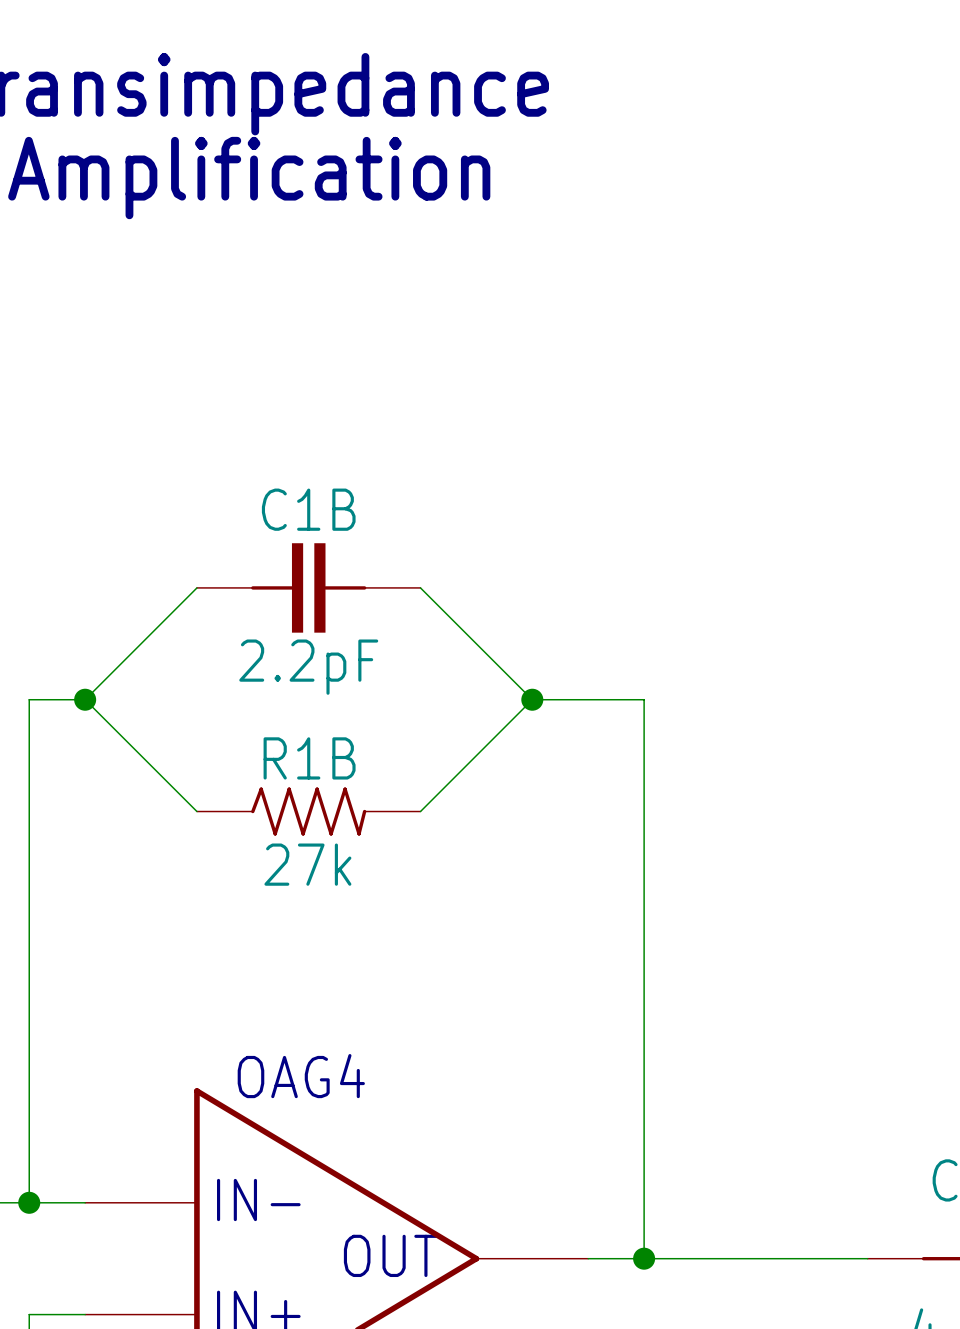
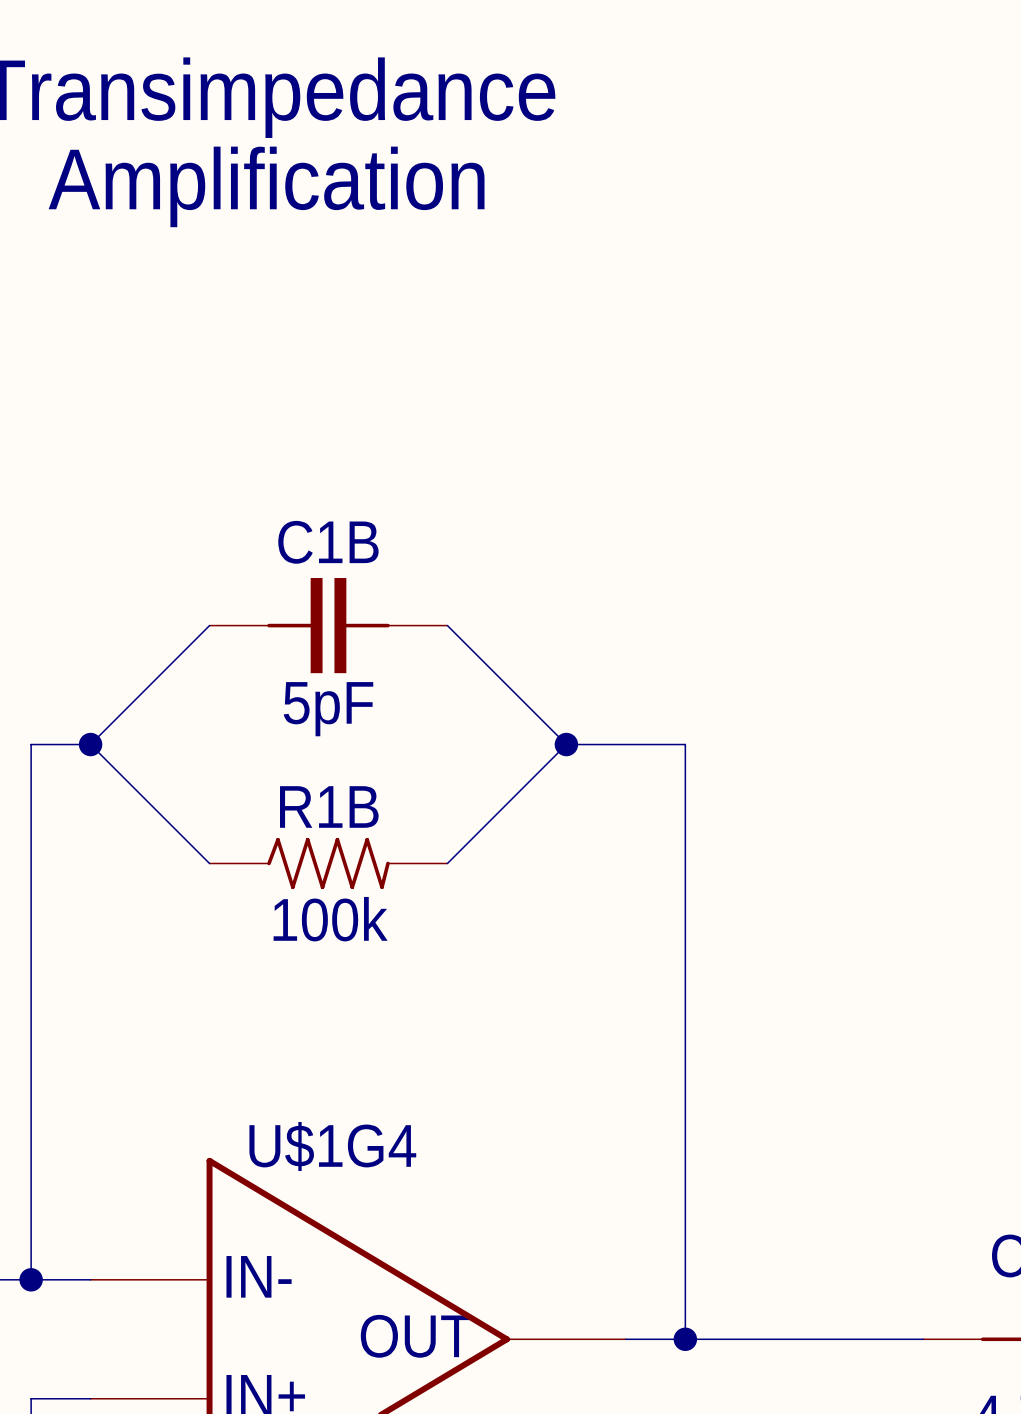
C1B value: 2.2pF (308, 667) -> 5pF (328, 709)
R1B value: 27k (307, 864) -> 100k (330, 919)
OAG4 name: OAG4 (301, 1076) -> U$1G4 (332, 1146)

